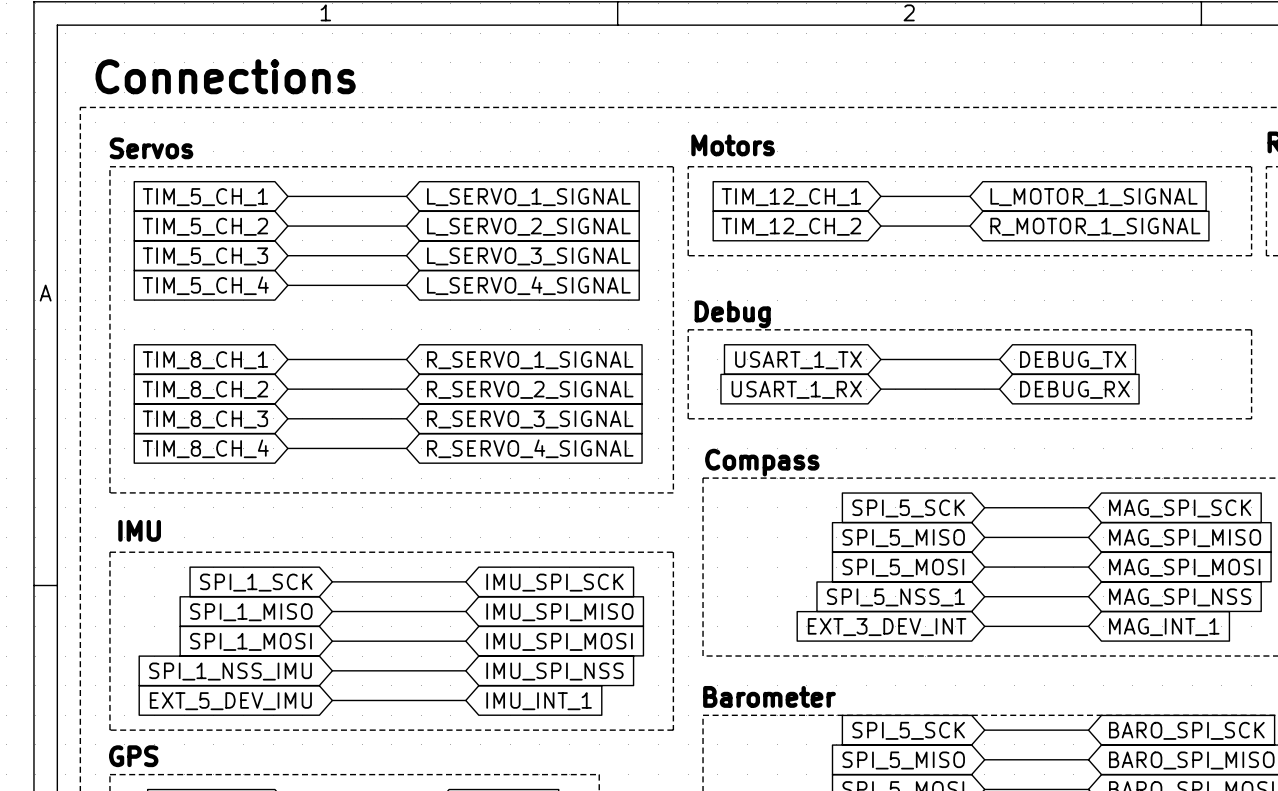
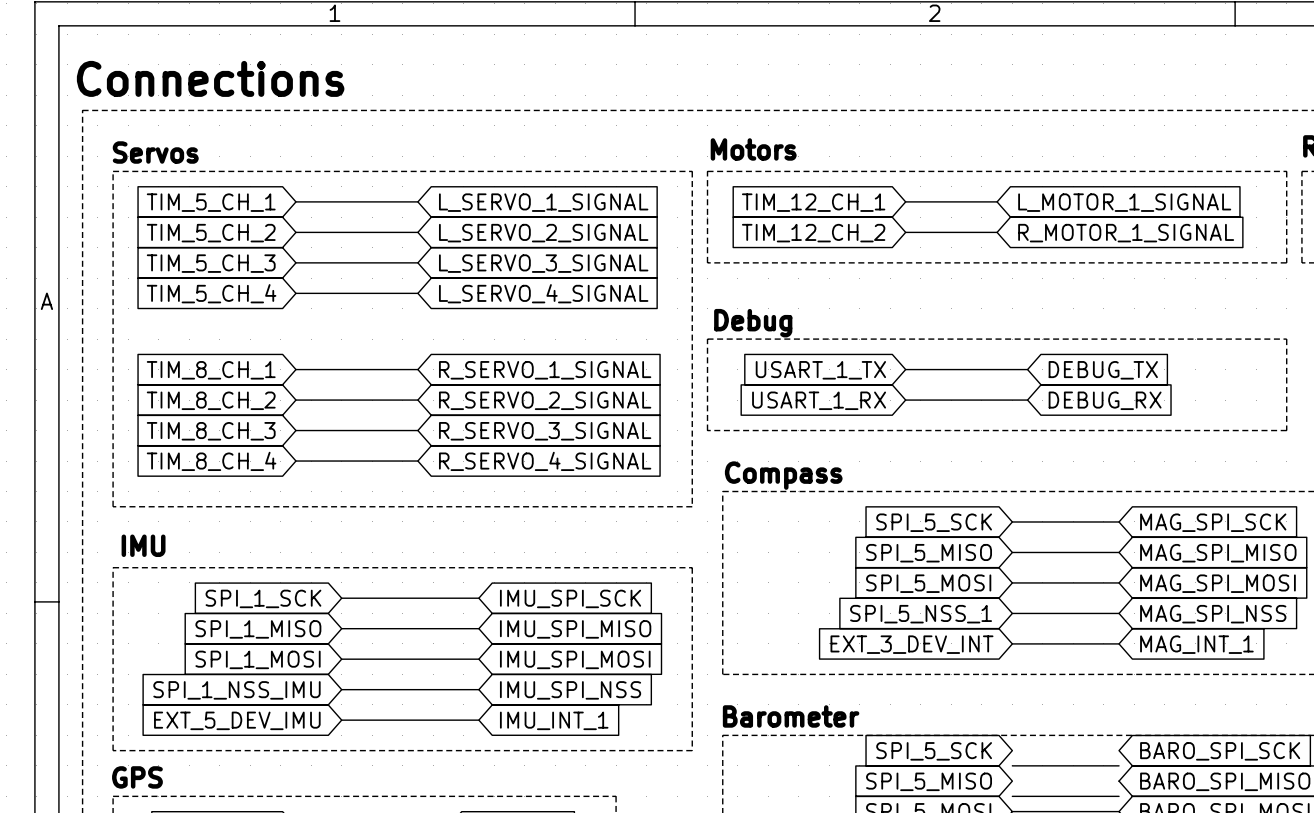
text position: Connections (225, 76) -> Connections (210, 78)
wire: (984, 730) (1088, 730) -> (1012, 765) (1119, 765)
wire: (984, 759) (1088, 759) -> (1012, 796) (1119, 796)

